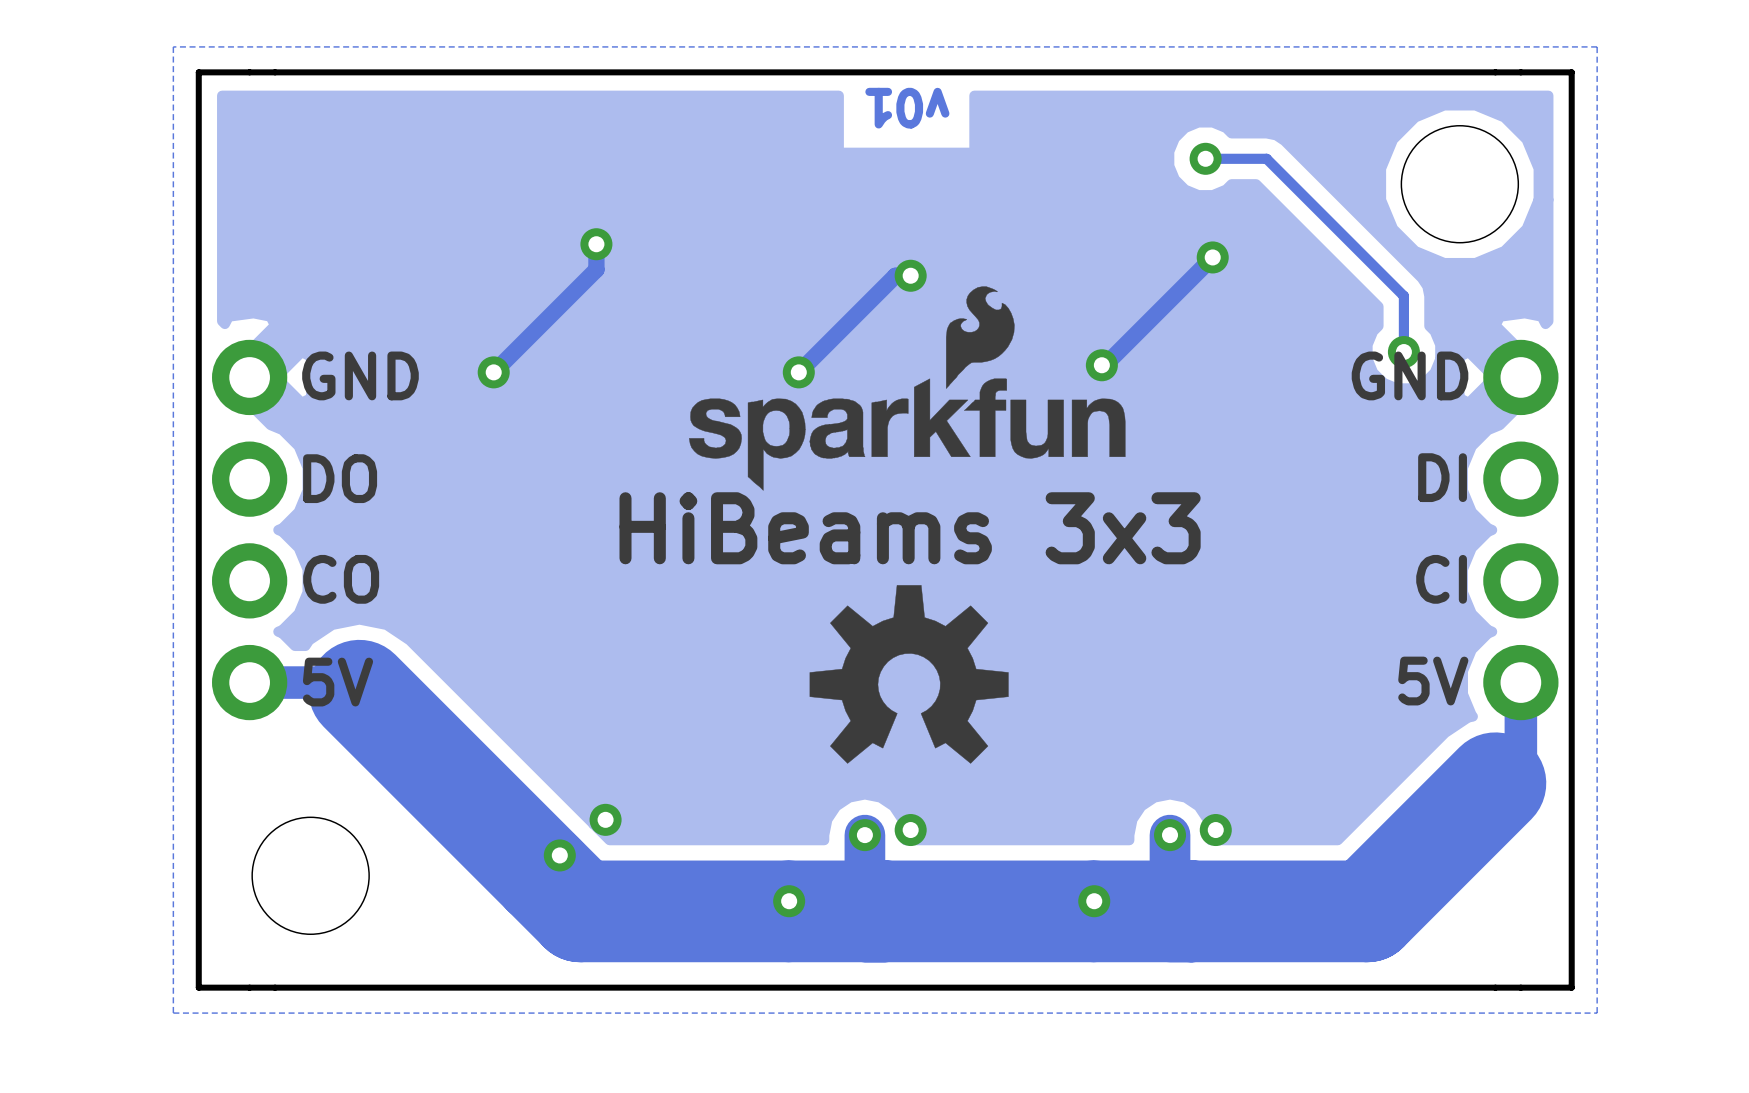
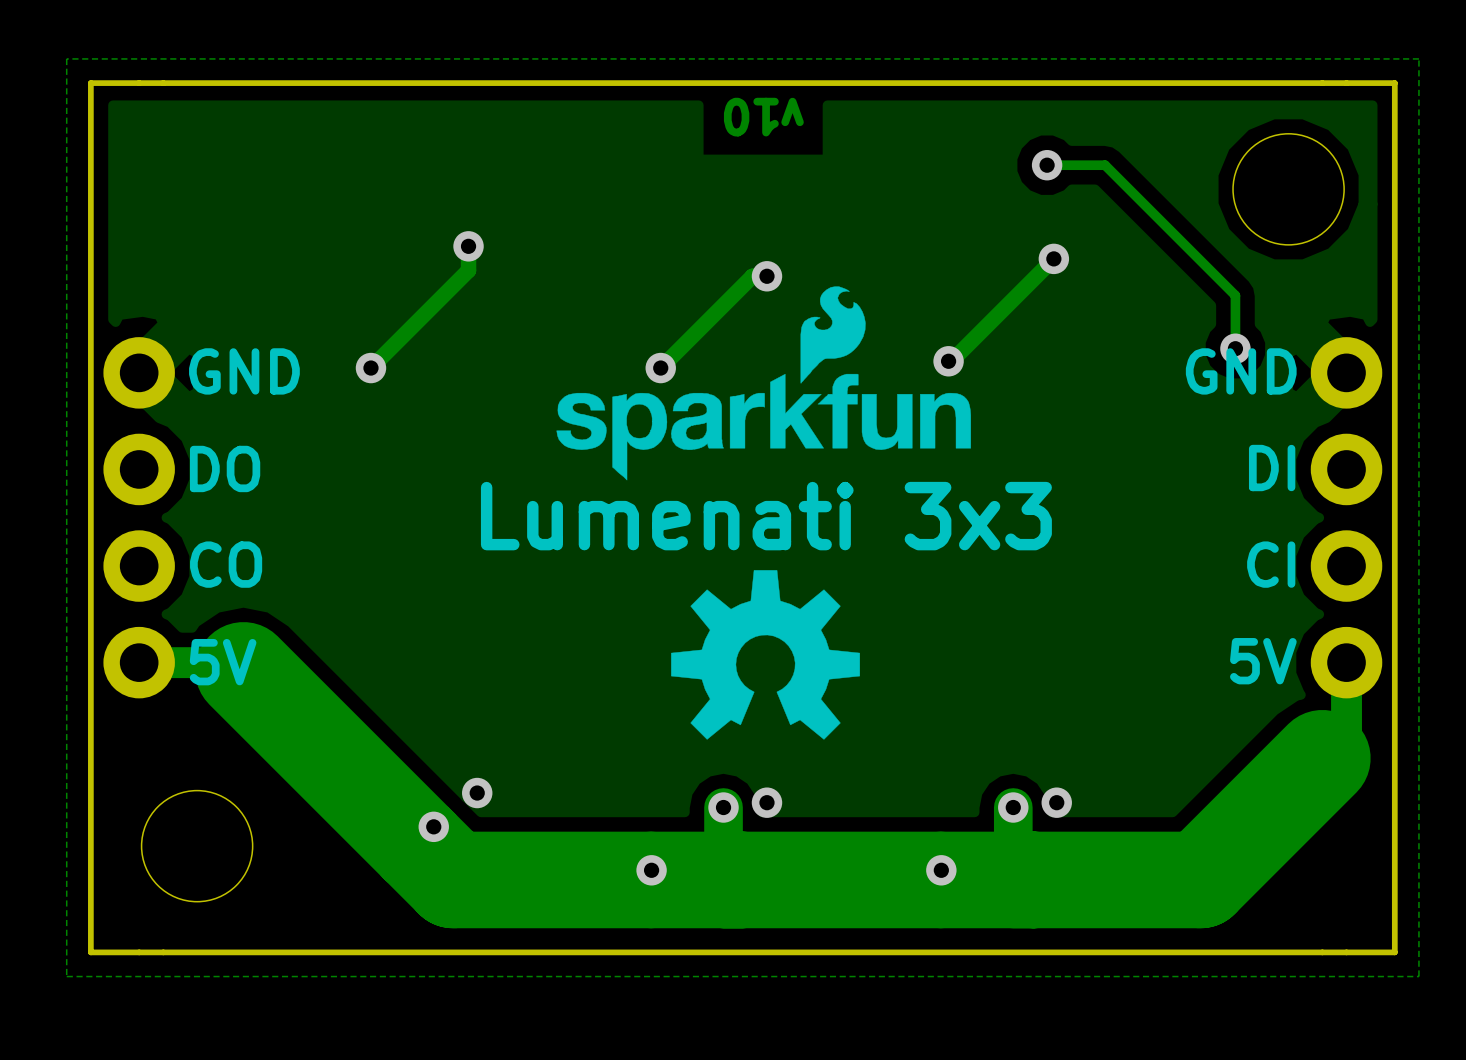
text: v01 (907, 108) -> v10 (763, 117)
text: HiBeams 3x3 (910, 528) -> Lumenati 3x3 (766, 516)

